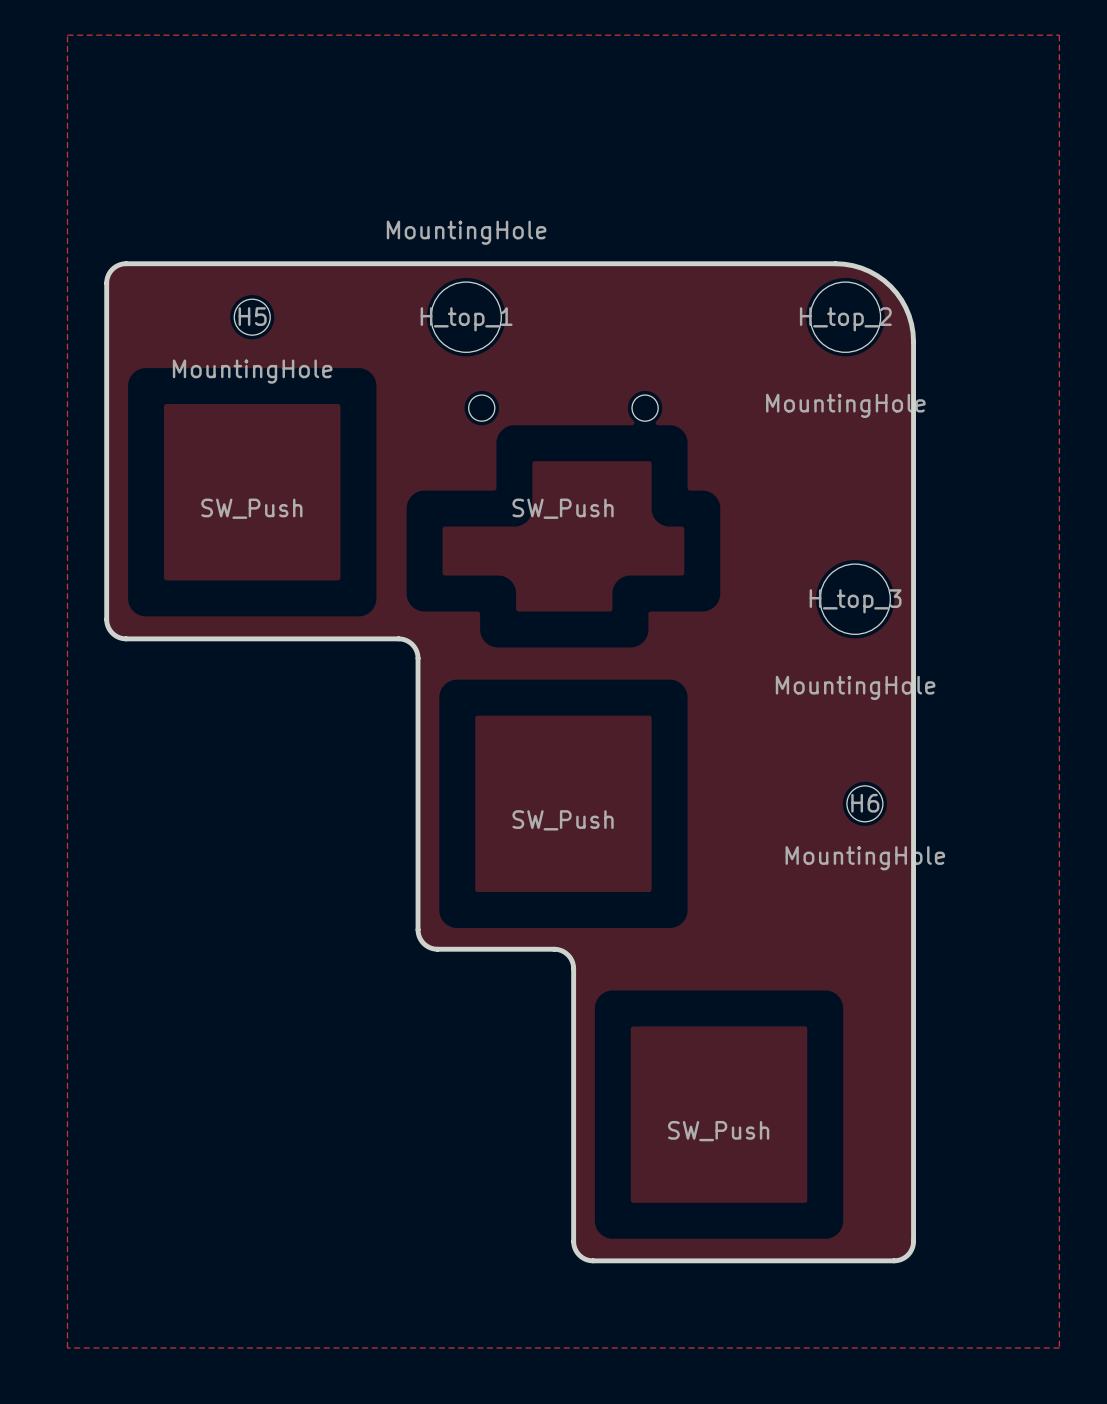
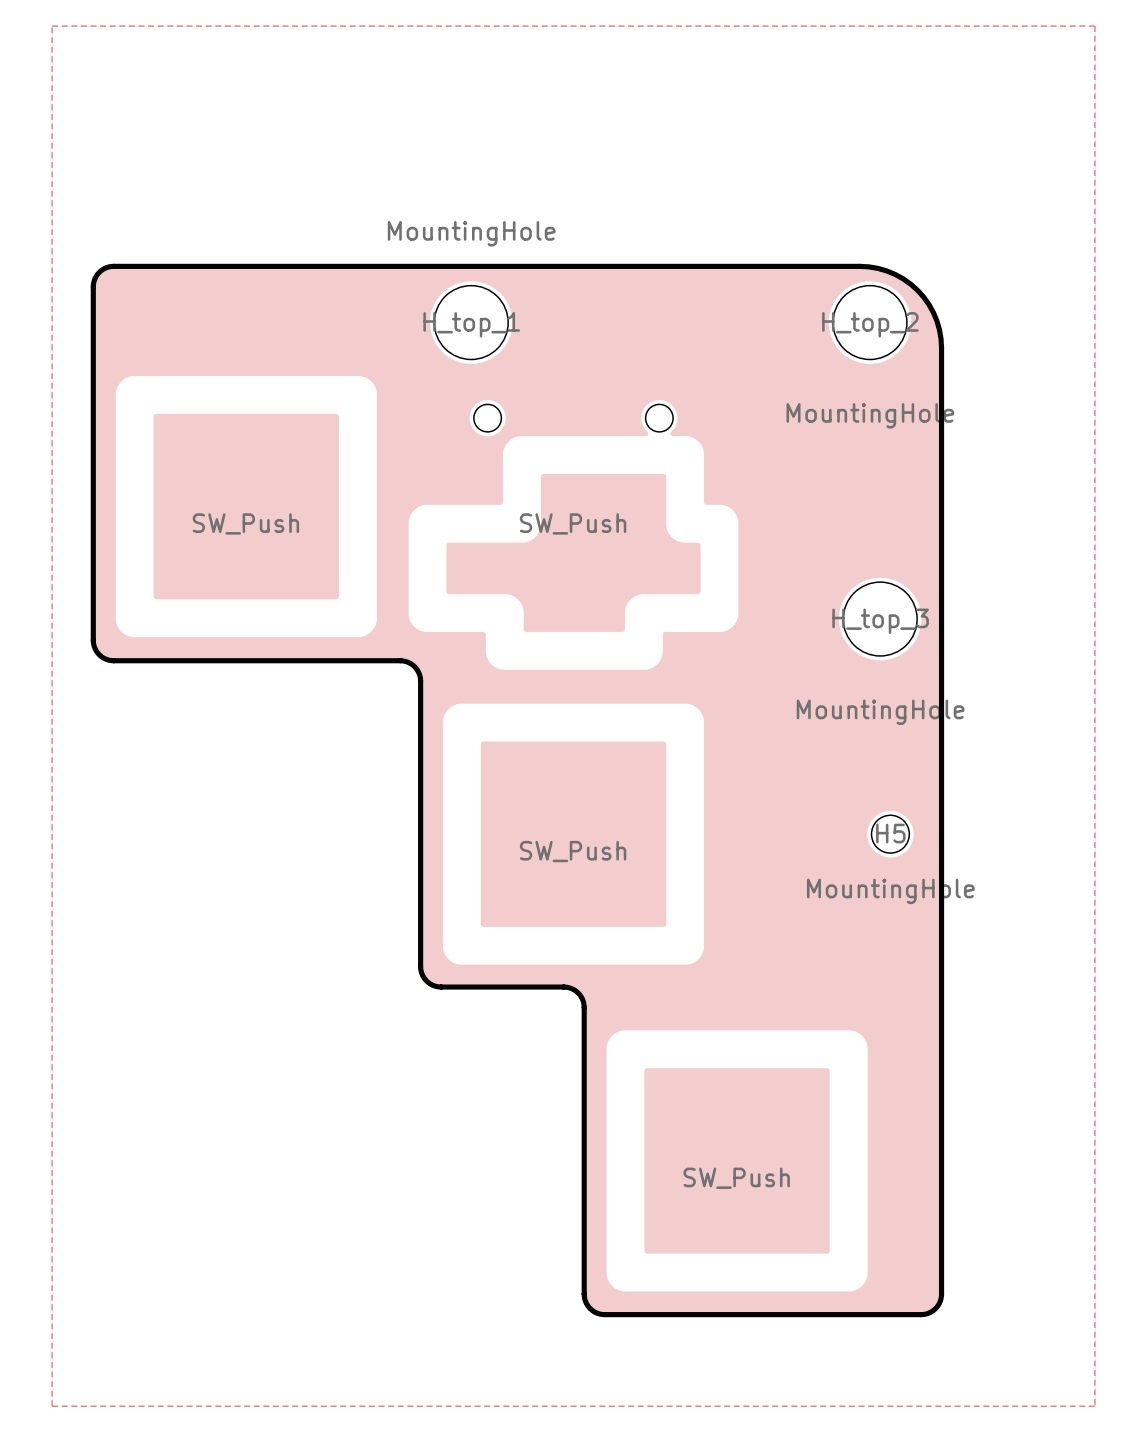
H5: MountingHole (252, 317) -> none
H6 name: H6 (865, 803) -> H5 (890, 833)

